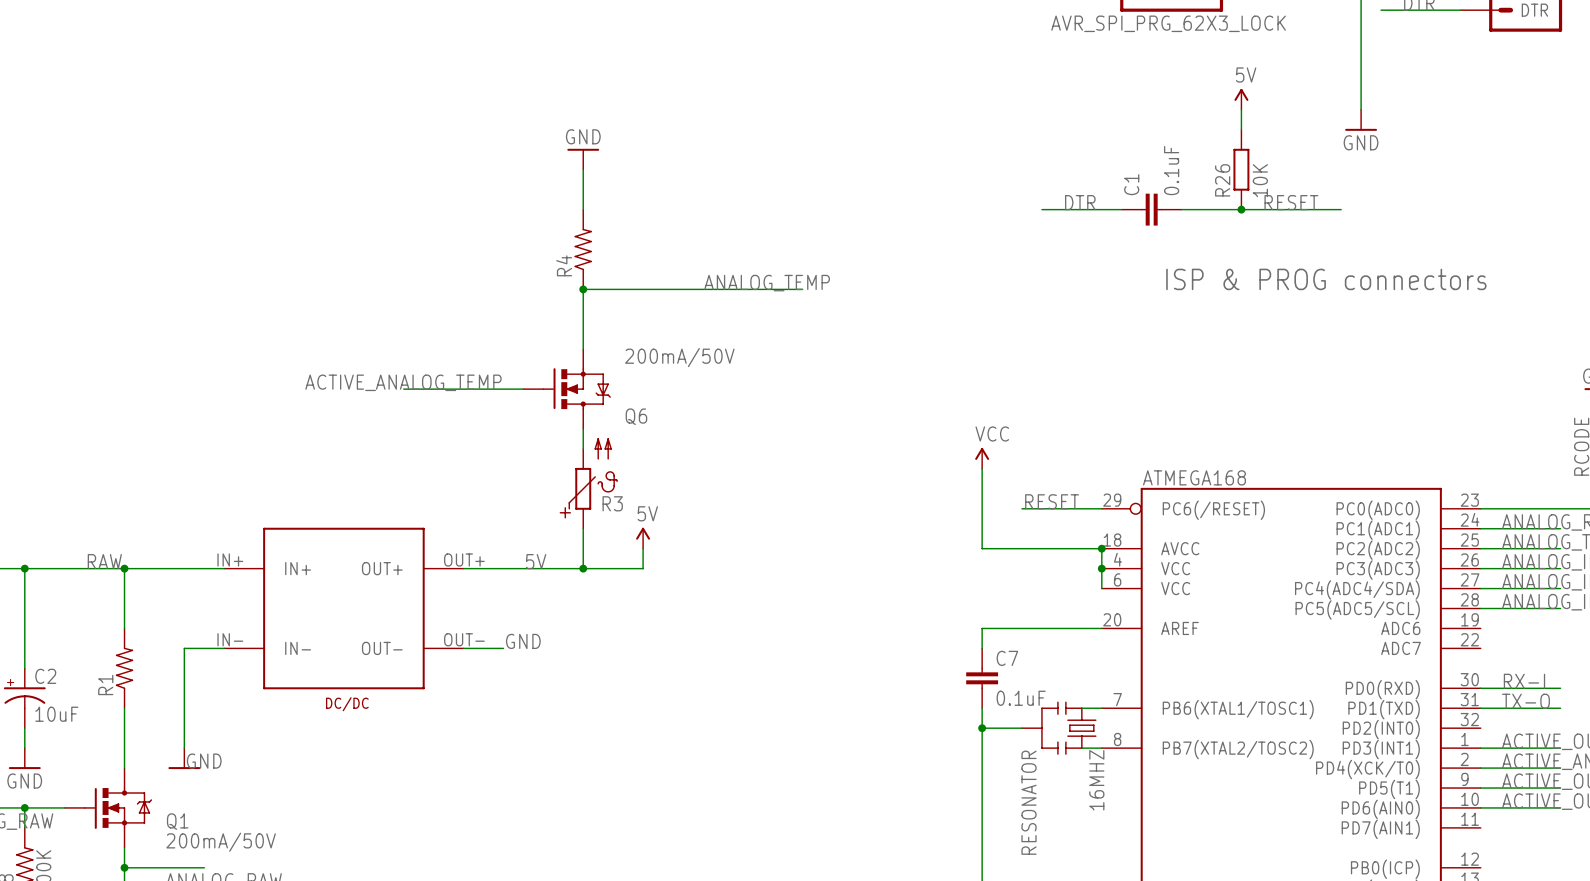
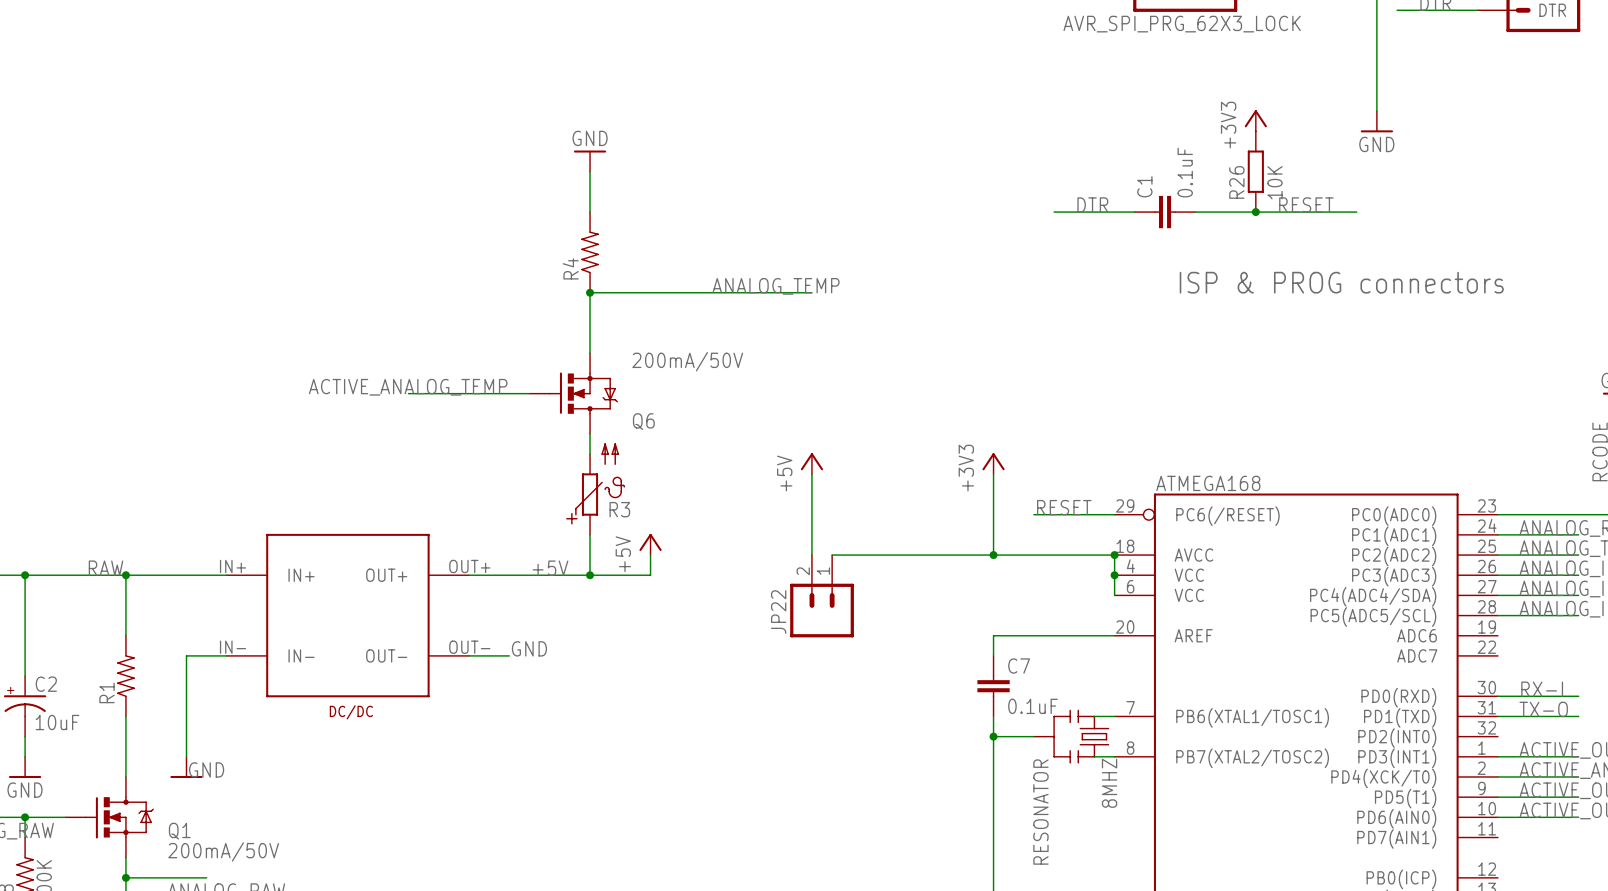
power symbol: 5V (1241, 99) -> none
power symbol: none -> +3V3 (1255, 120)
power symbol: none -> +5V (811, 463)
power symbol: VCC (982, 458) -> +3V3 (993, 463)
wire: none -> (811, 474) (811, 555)
power symbol: 5V (643, 538) -> +5V (650, 544)
wire: none -> (832, 555) (993, 555)
junction: none -> (993, 555)
label: 5V (536, 561) -> +5V (550, 568)
JP22: none -> (822, 596)
16MHZ name: 16MHZ (1096, 780) -> 8MHZ (1109, 783)

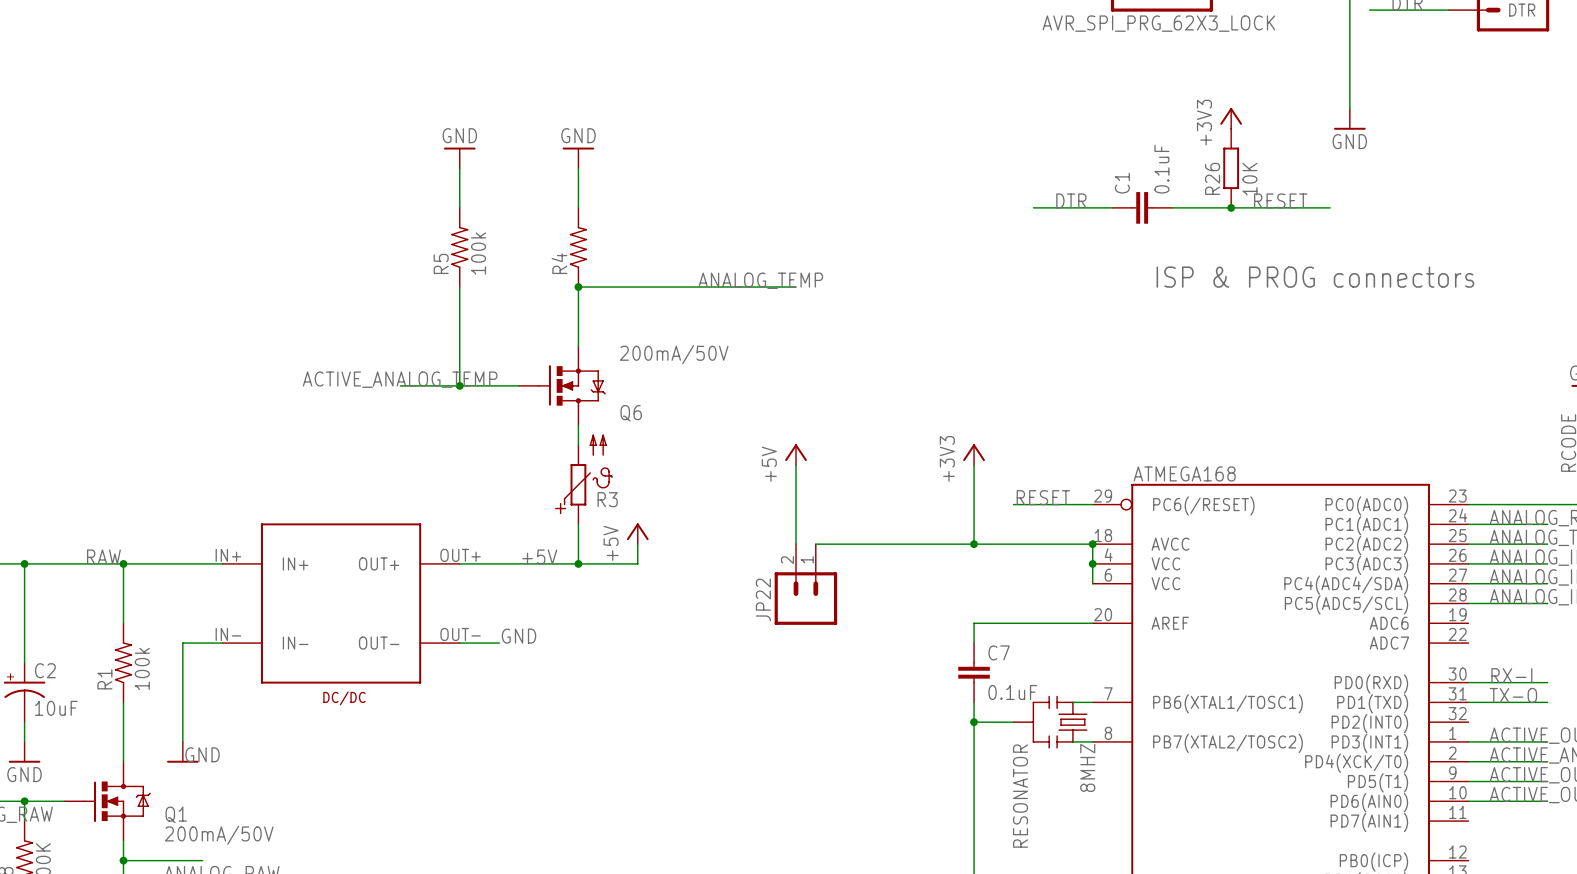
power symbol: none -> GND (459, 157)
wire: none -> (459, 168) (459, 207)
R5: none -> 100k (459, 247)
wire: none -> (459, 287) (459, 385)
junction: none -> (459, 385)
R1 value: none -> 100k (142, 668)

